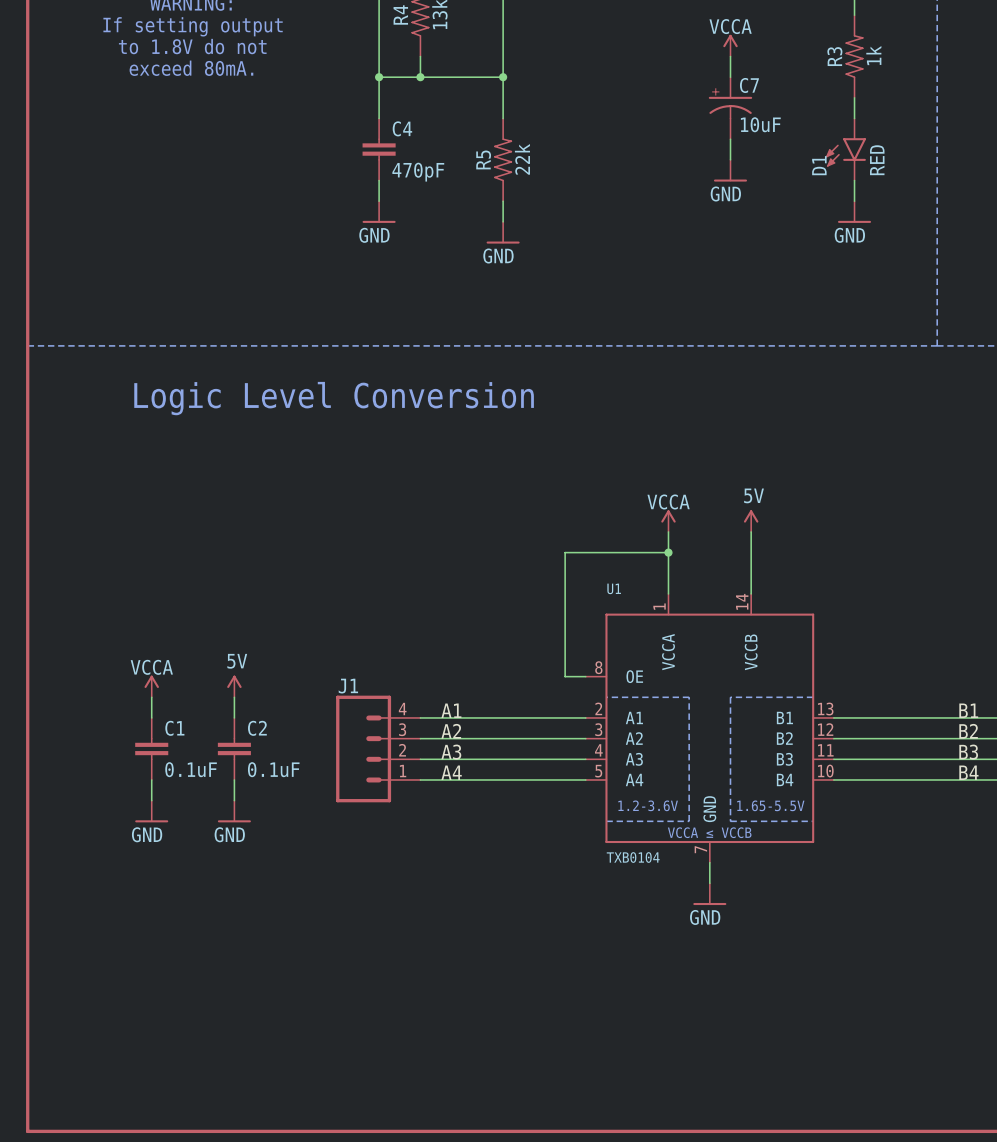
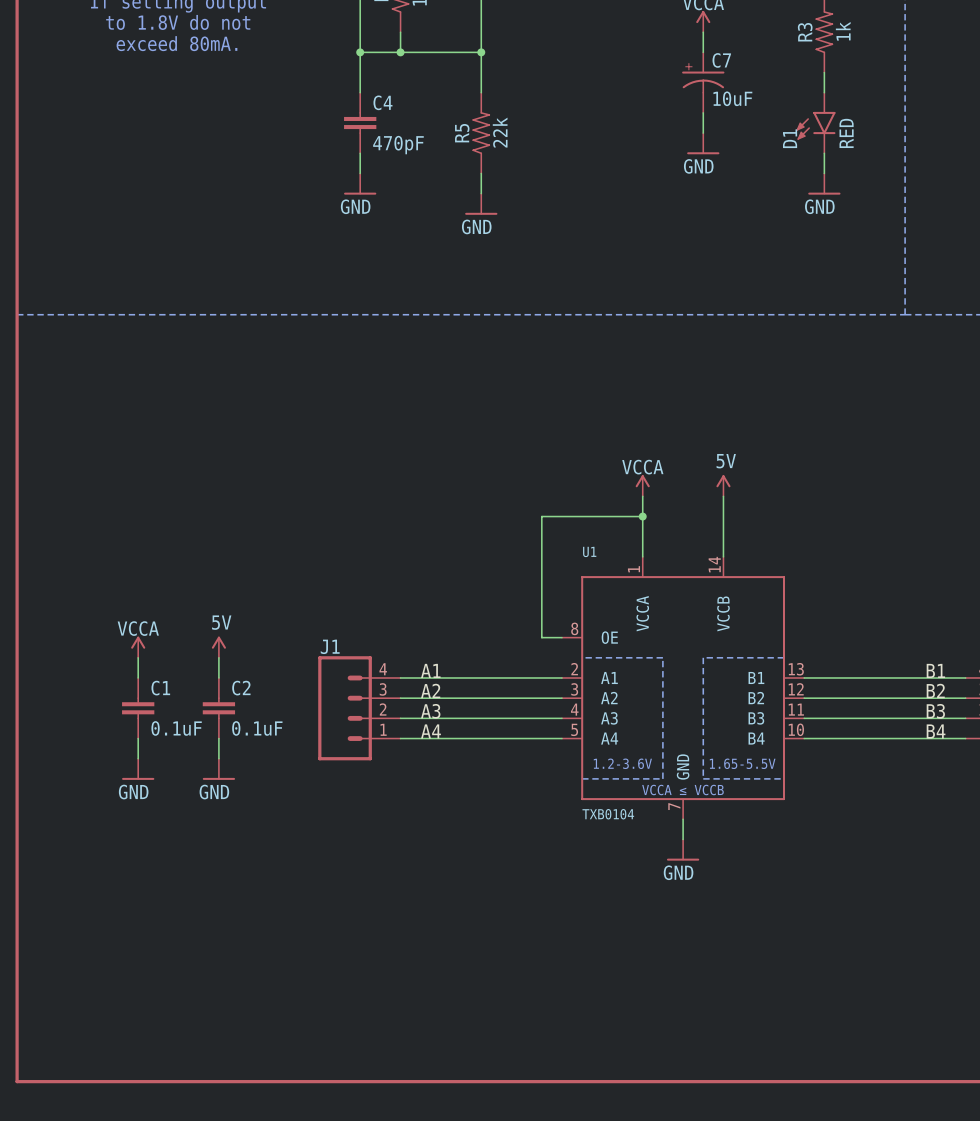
text: Logic Level Conversion (334, 398) -> none

